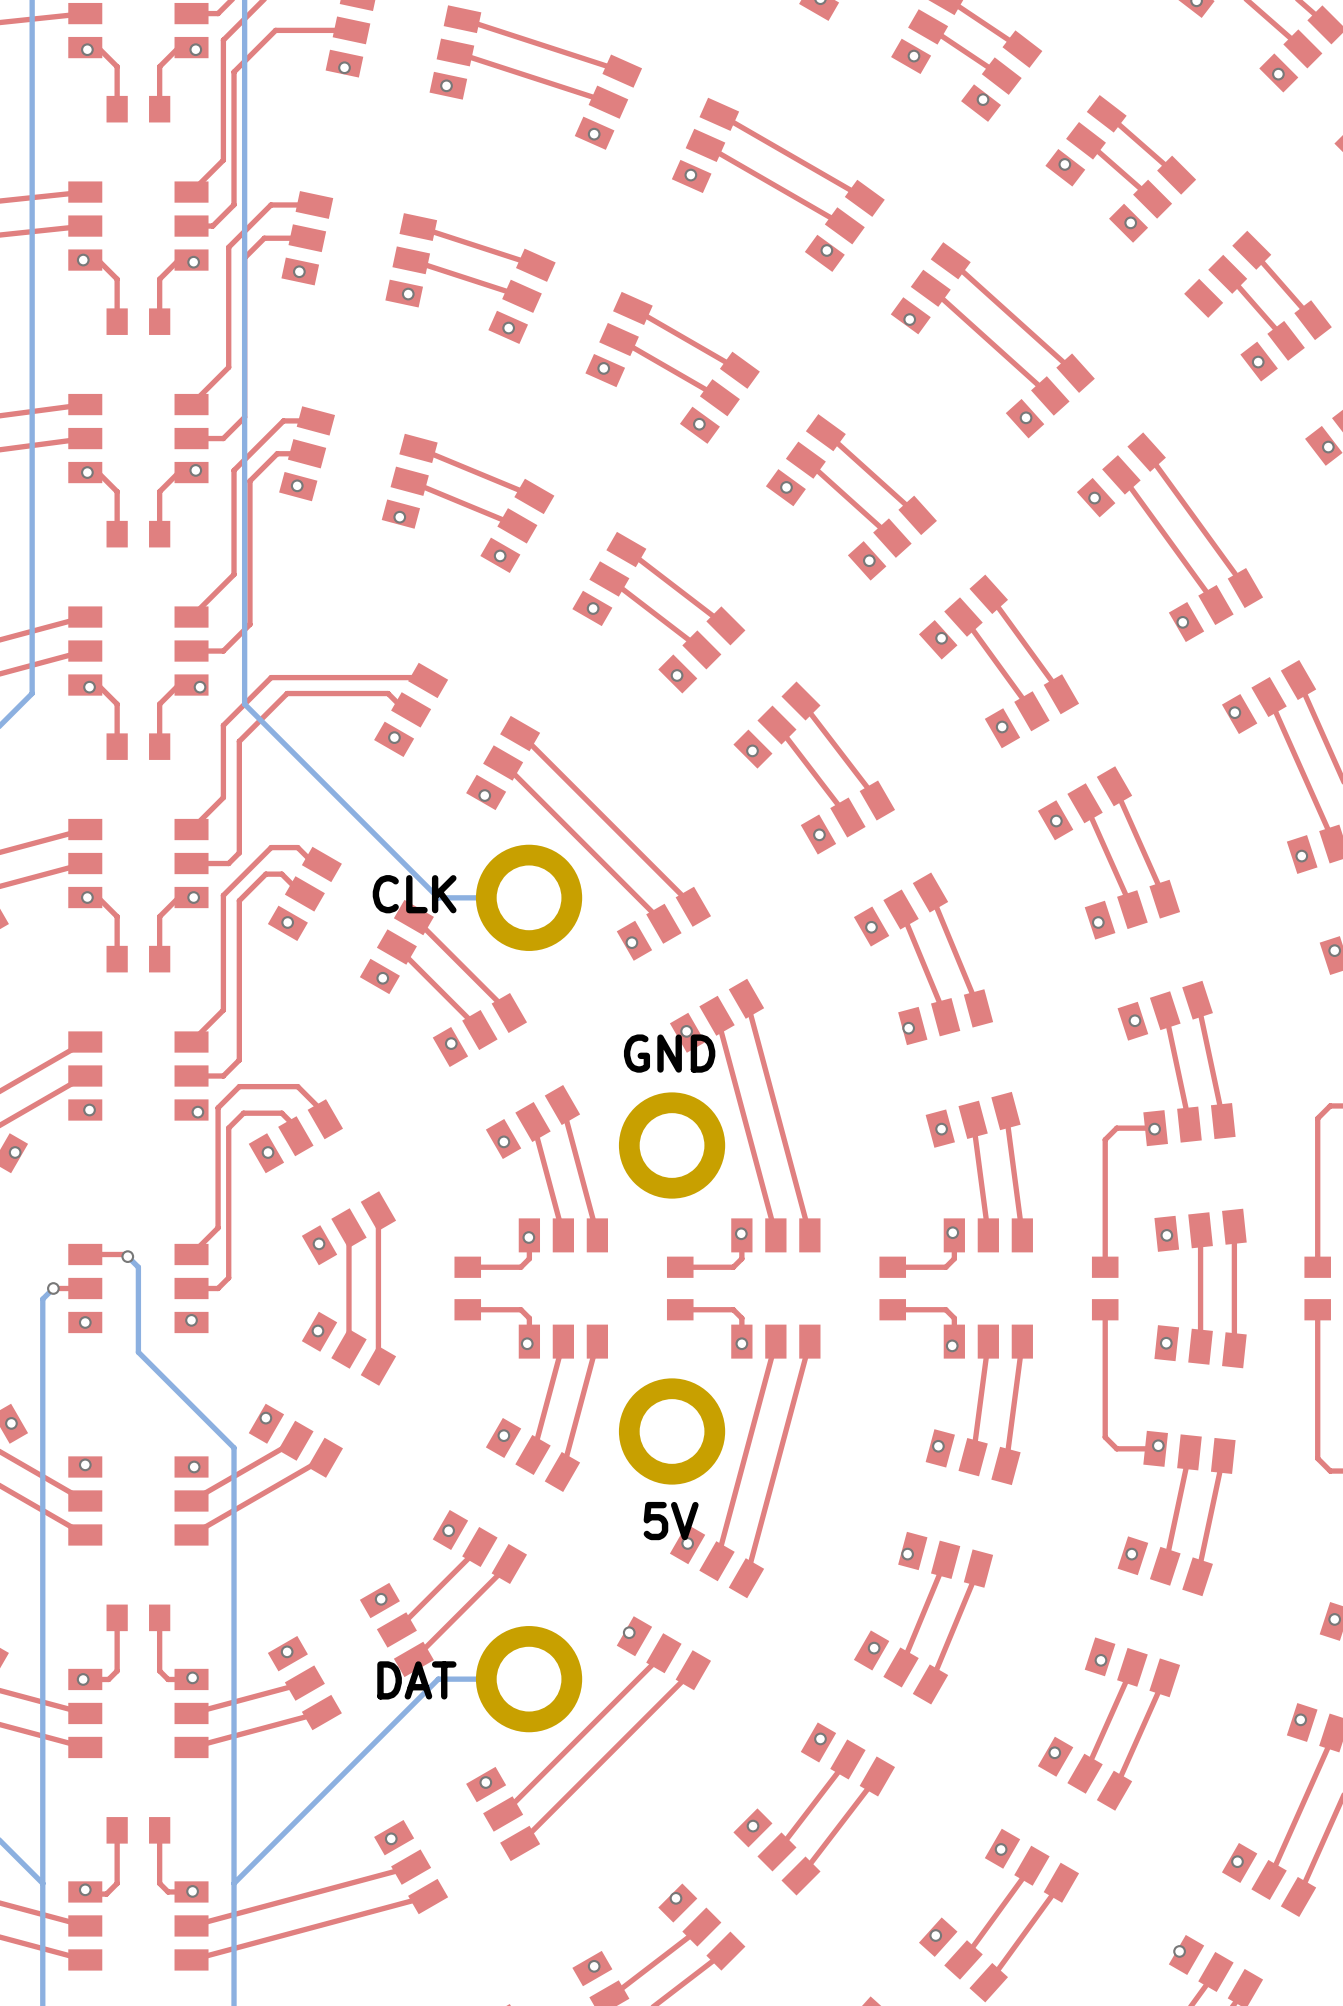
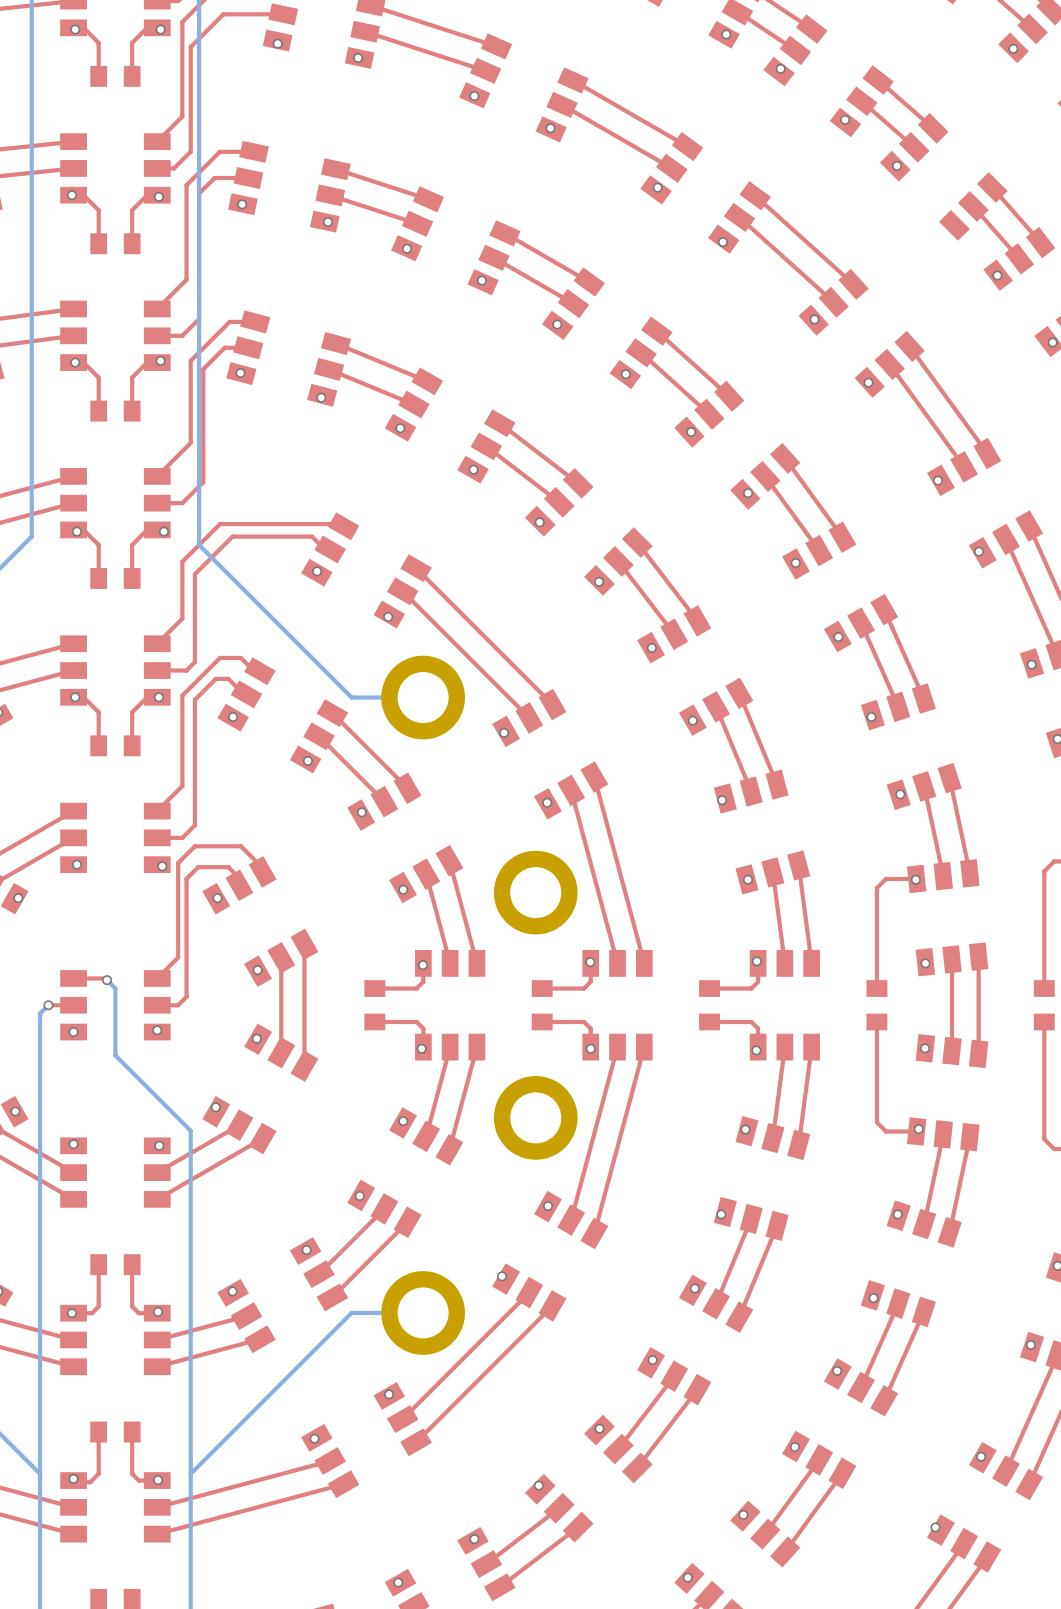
text: CLK (414, 894) -> none
text: GND (669, 1053) -> none
text: 5V (671, 1521) -> none
text: DAT (416, 1680) -> none

